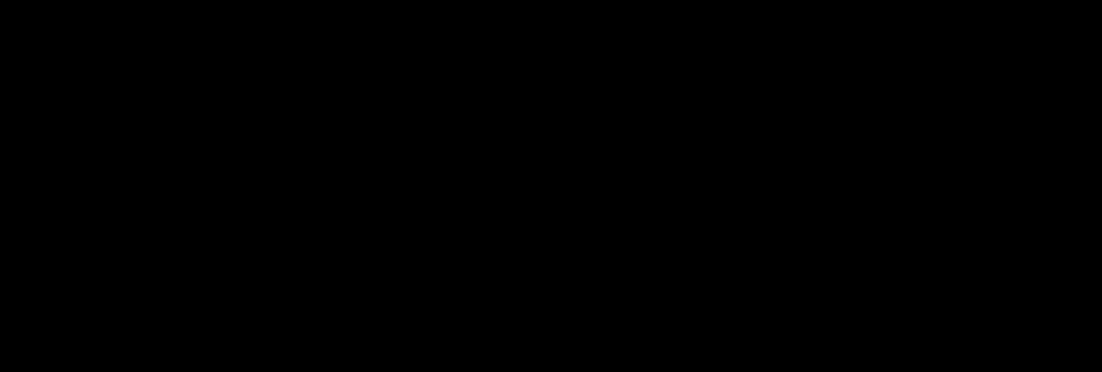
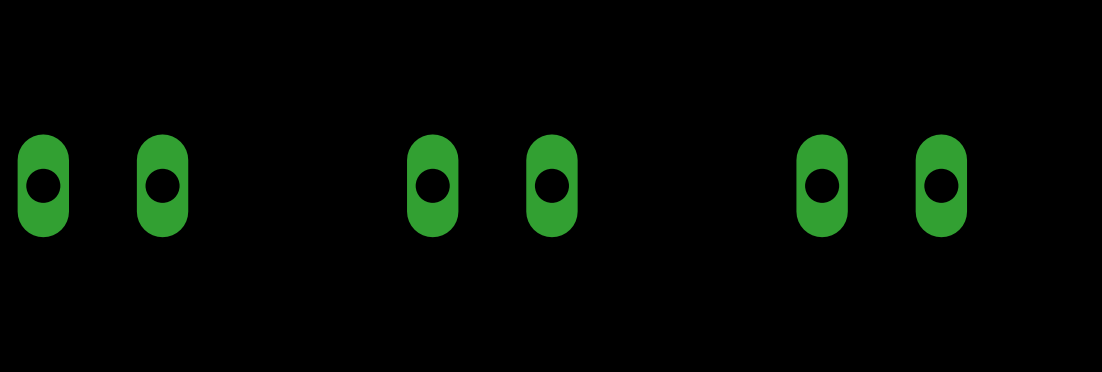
part: none -> (102, 185)
part: none -> (492, 185)
part: none -> (881, 185)

